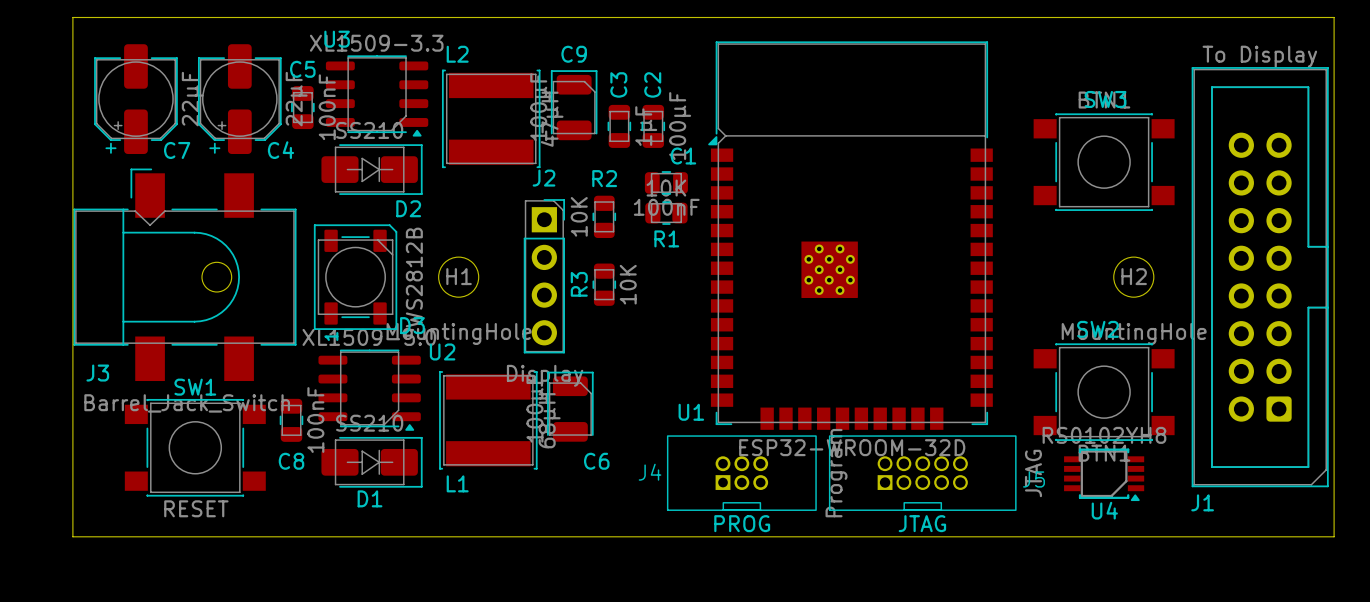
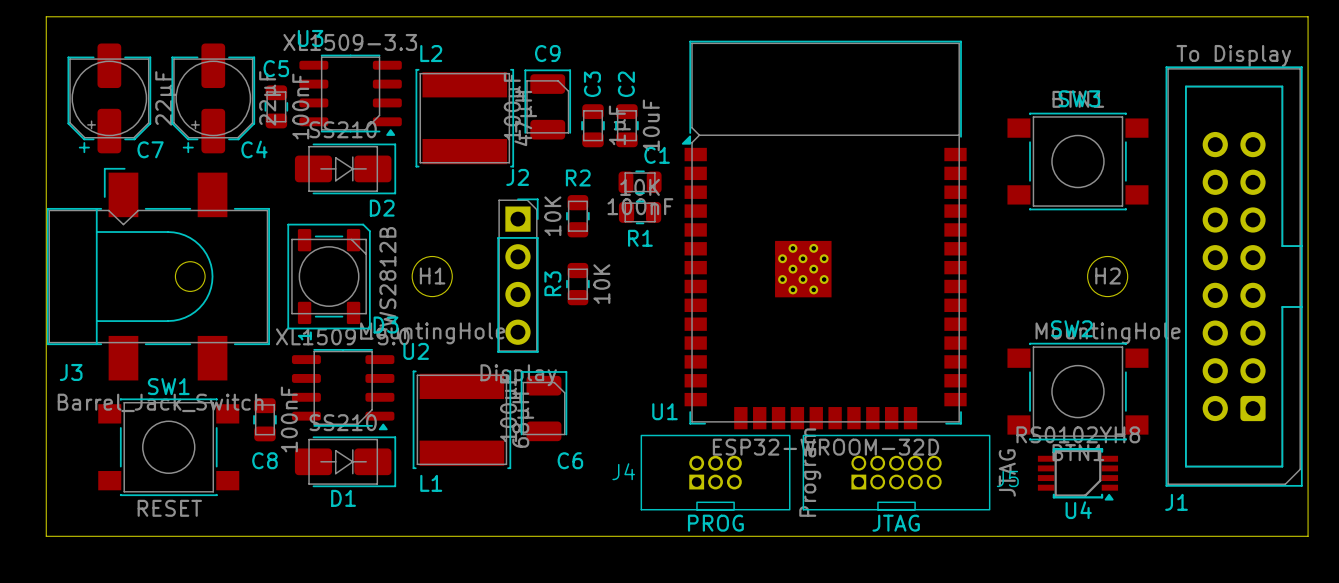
C2 value: 100µF (680, 126) -> 10uF (651, 125)

